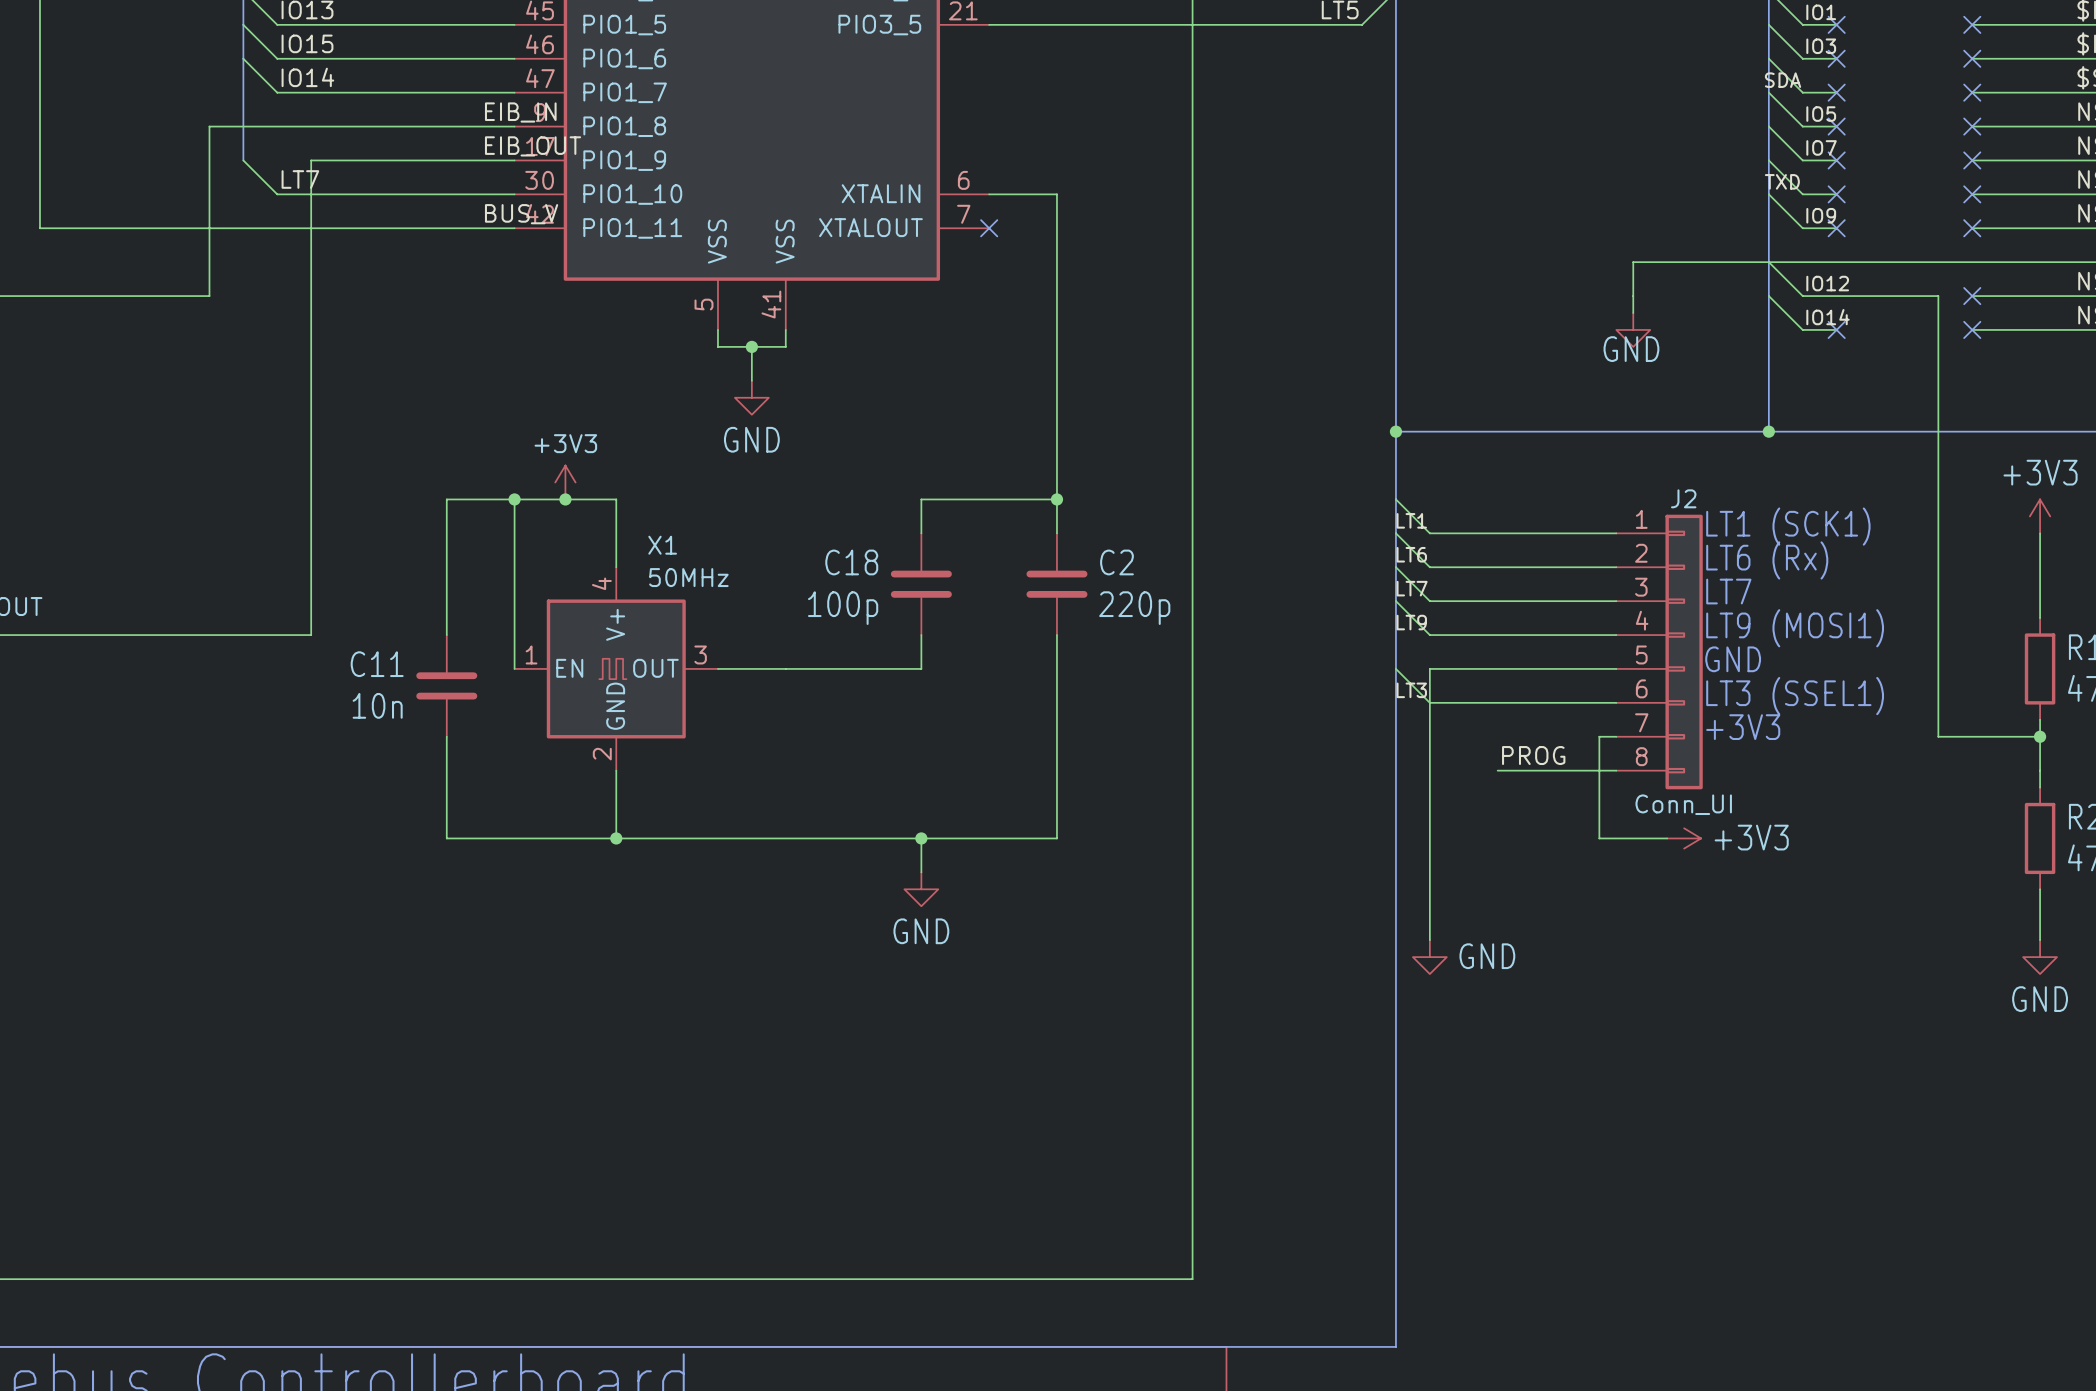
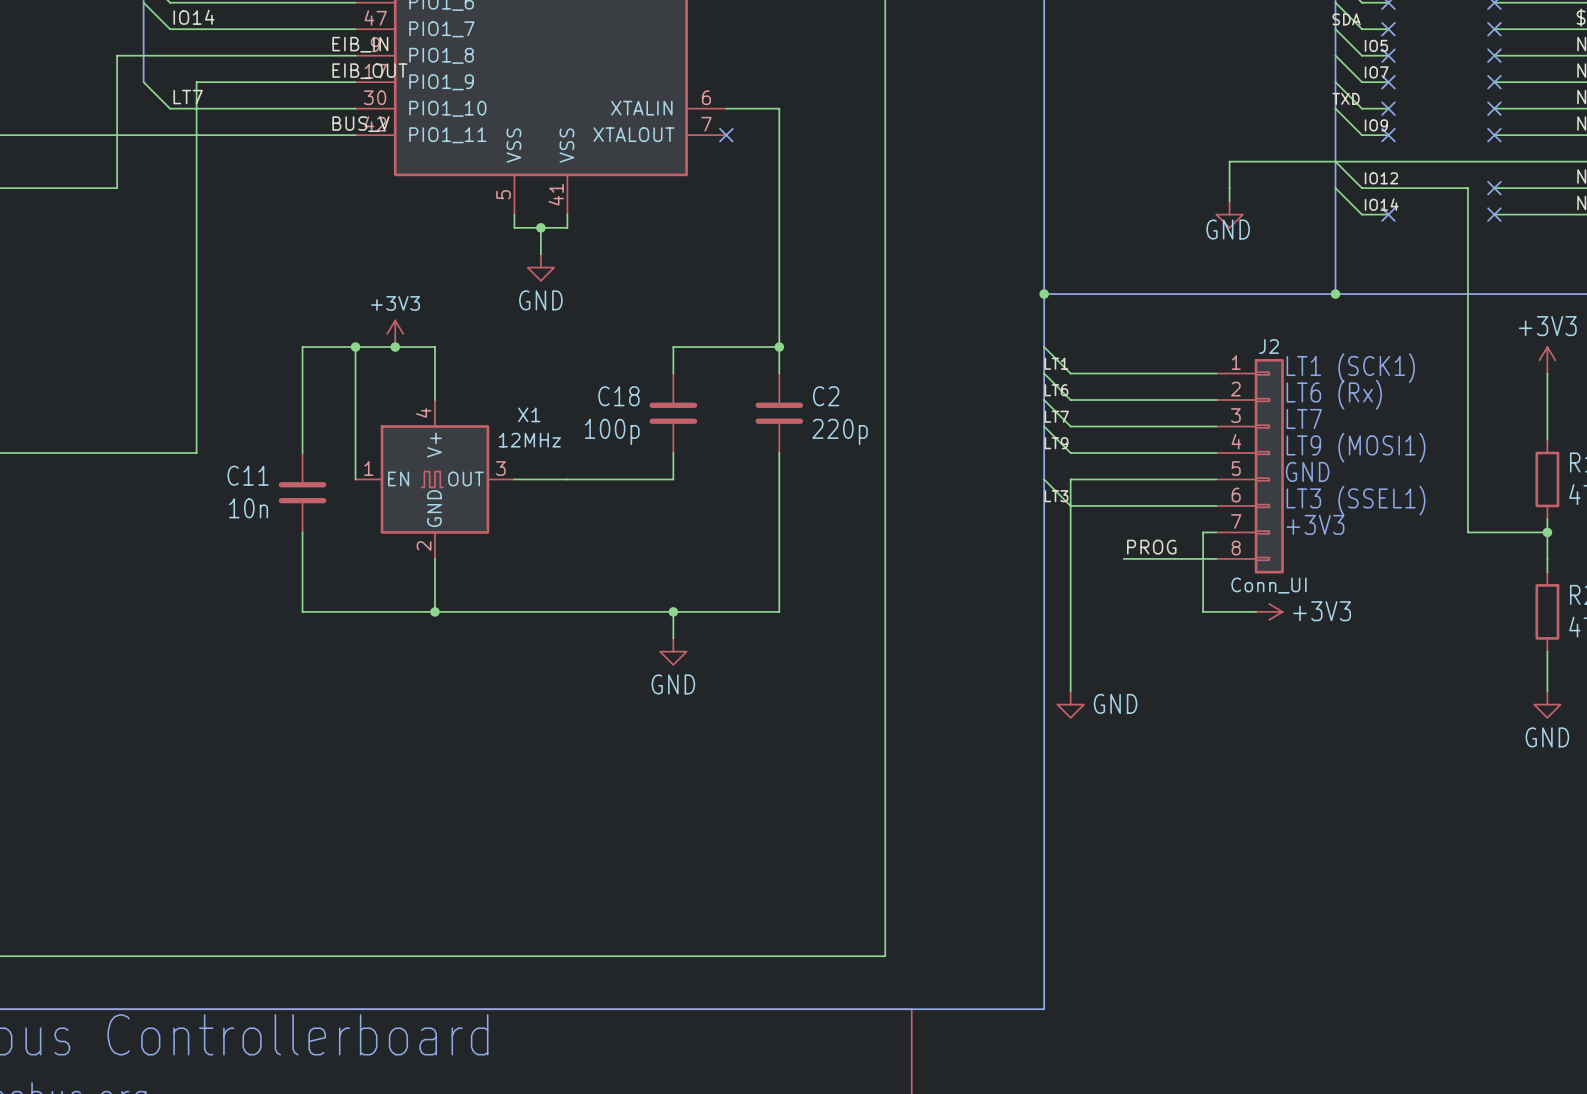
X1 name position: X1 (662, 545) -> X1 (529, 414)
X1 value: 50MHz (688, 577) -> 12MHz (529, 440)

